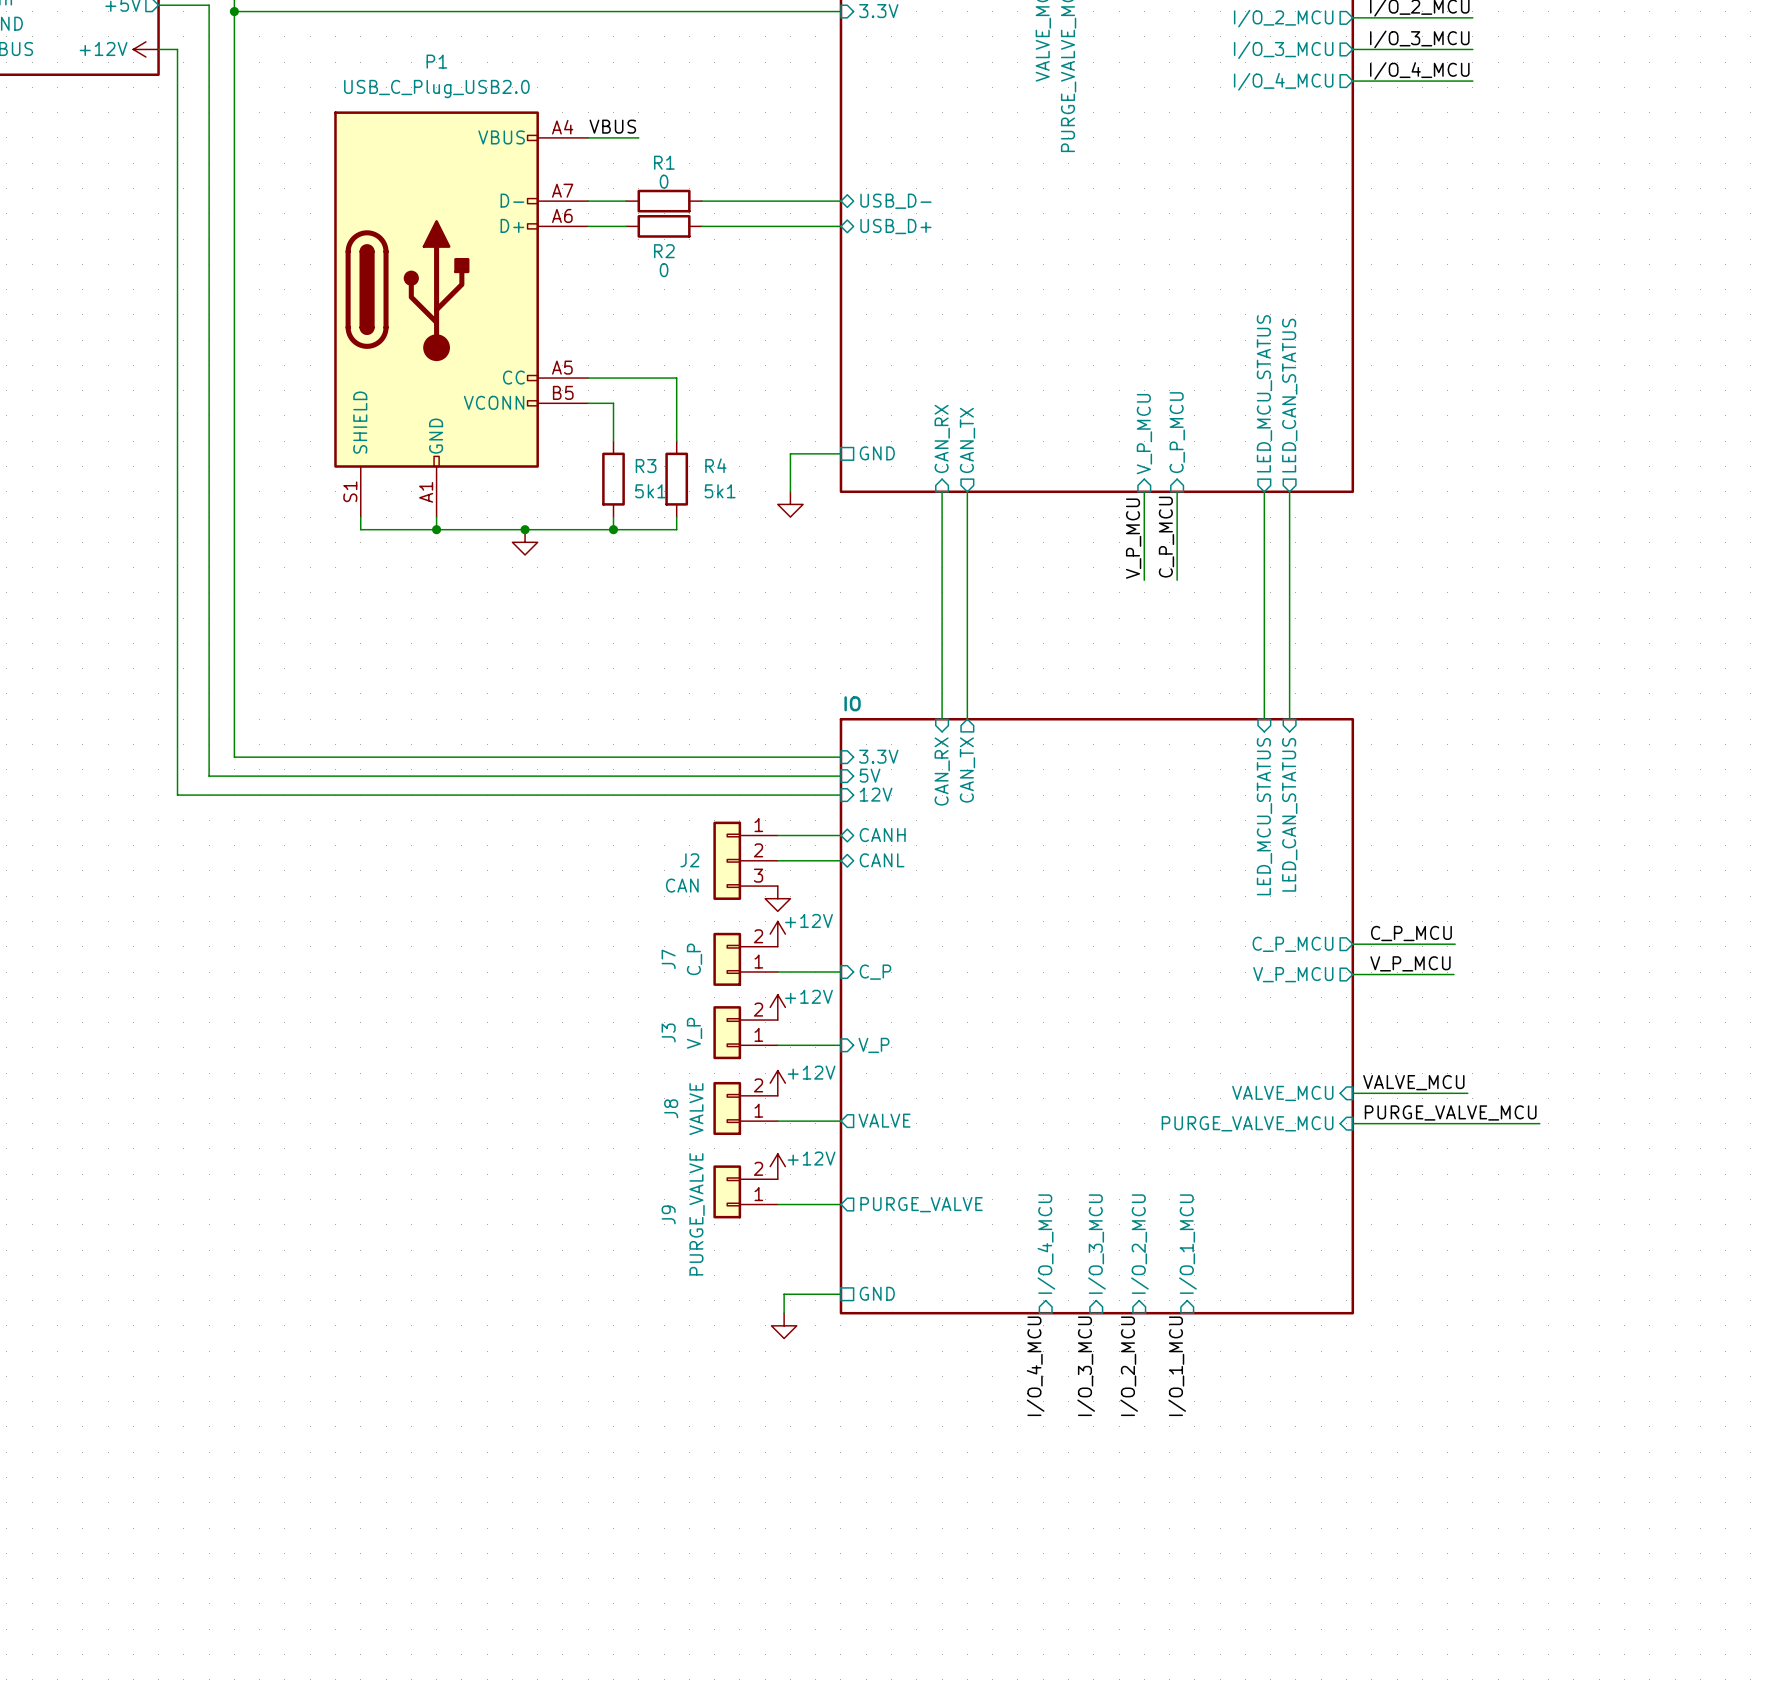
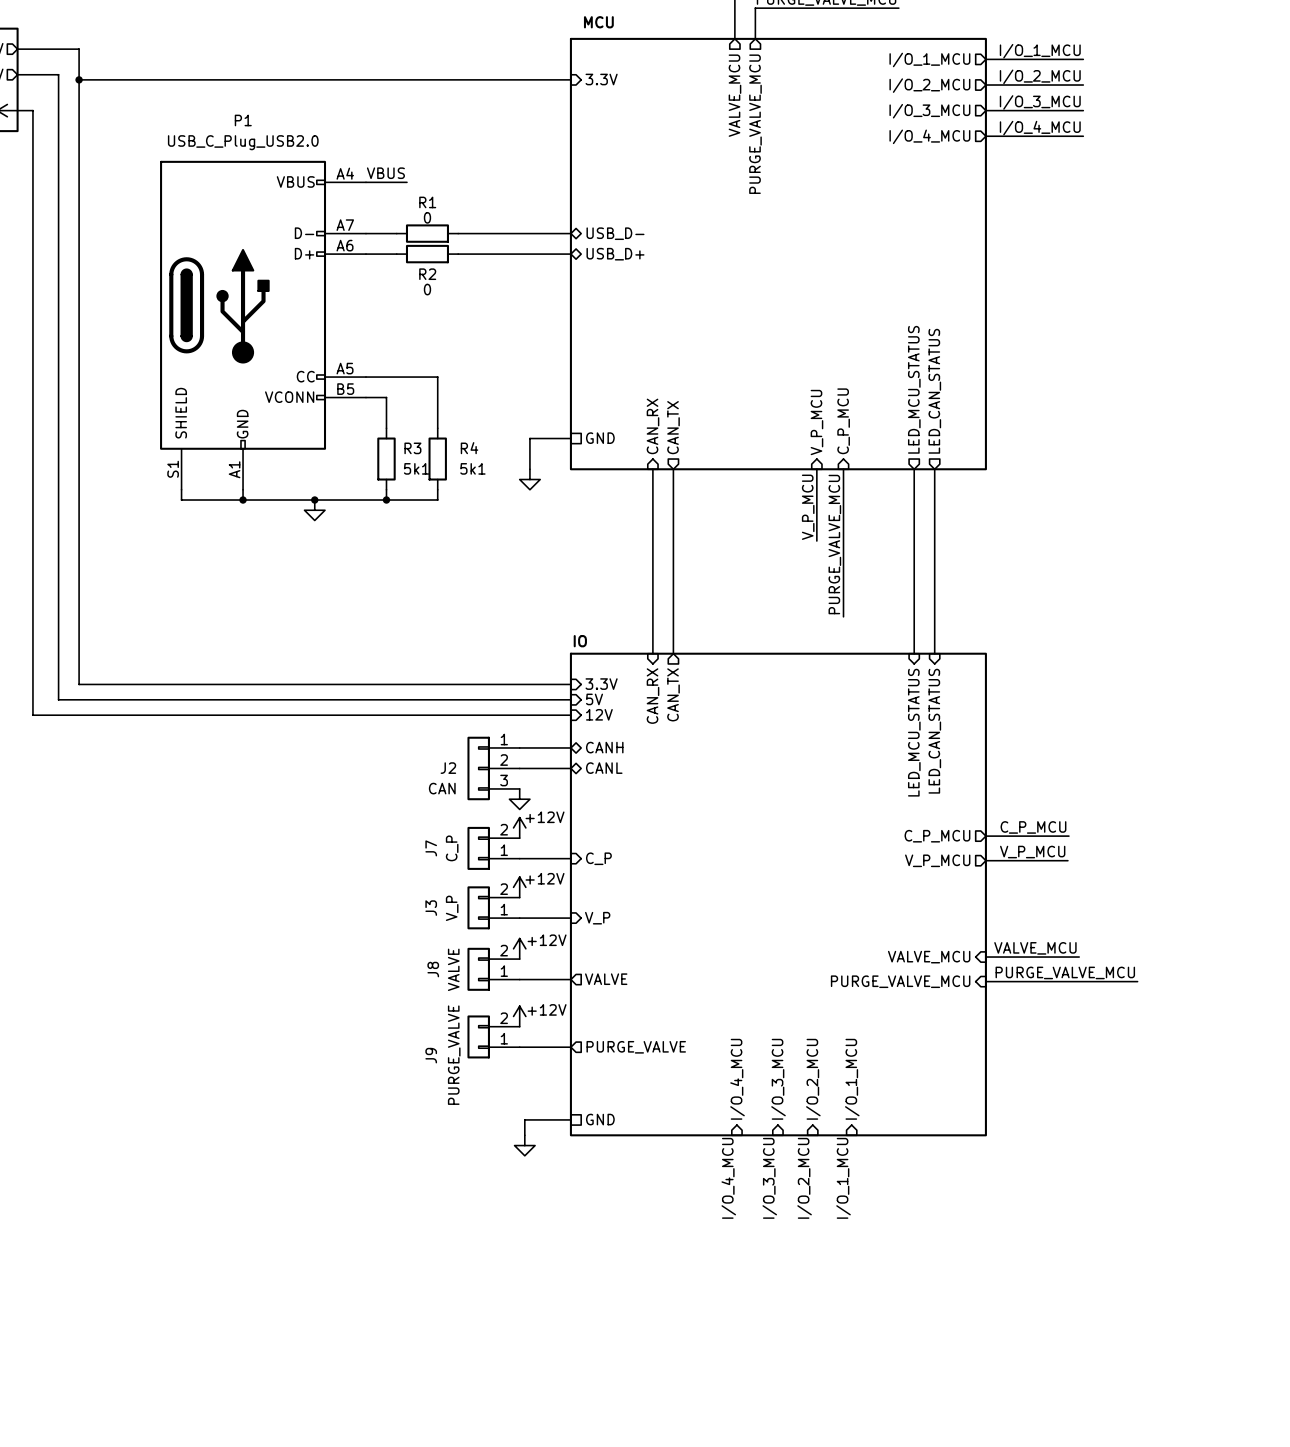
label: C_P_MCU (1166, 537) -> none
wire: none -> (843, 540) (843, 616)
label: none -> PURGE_VALVE_MCU (834, 544)

